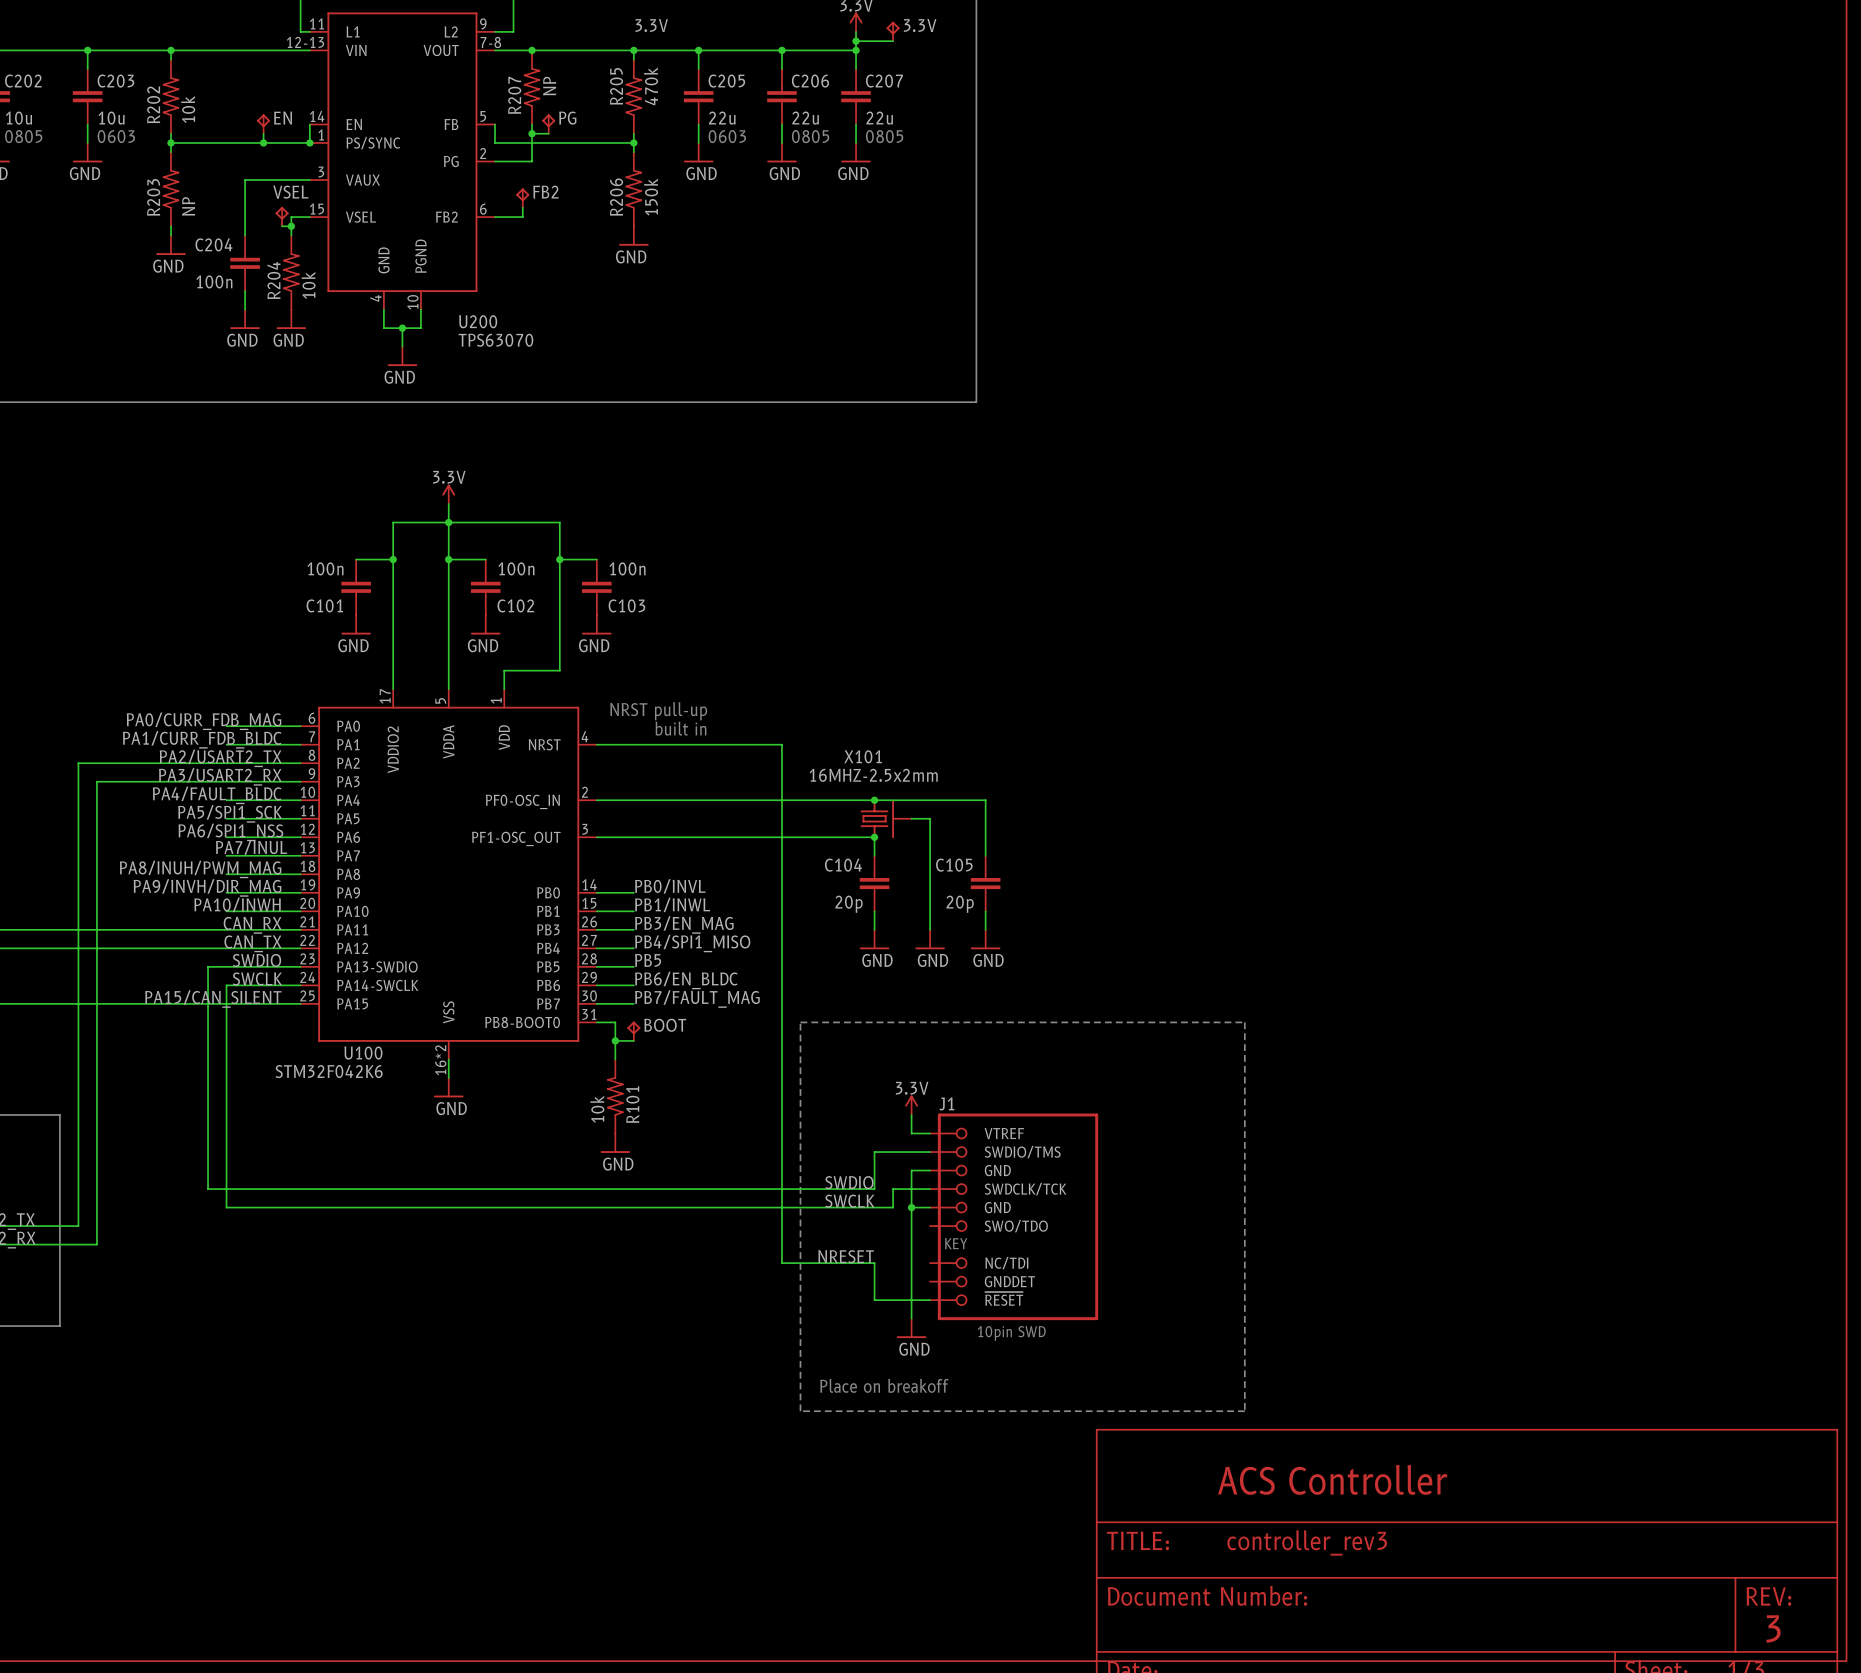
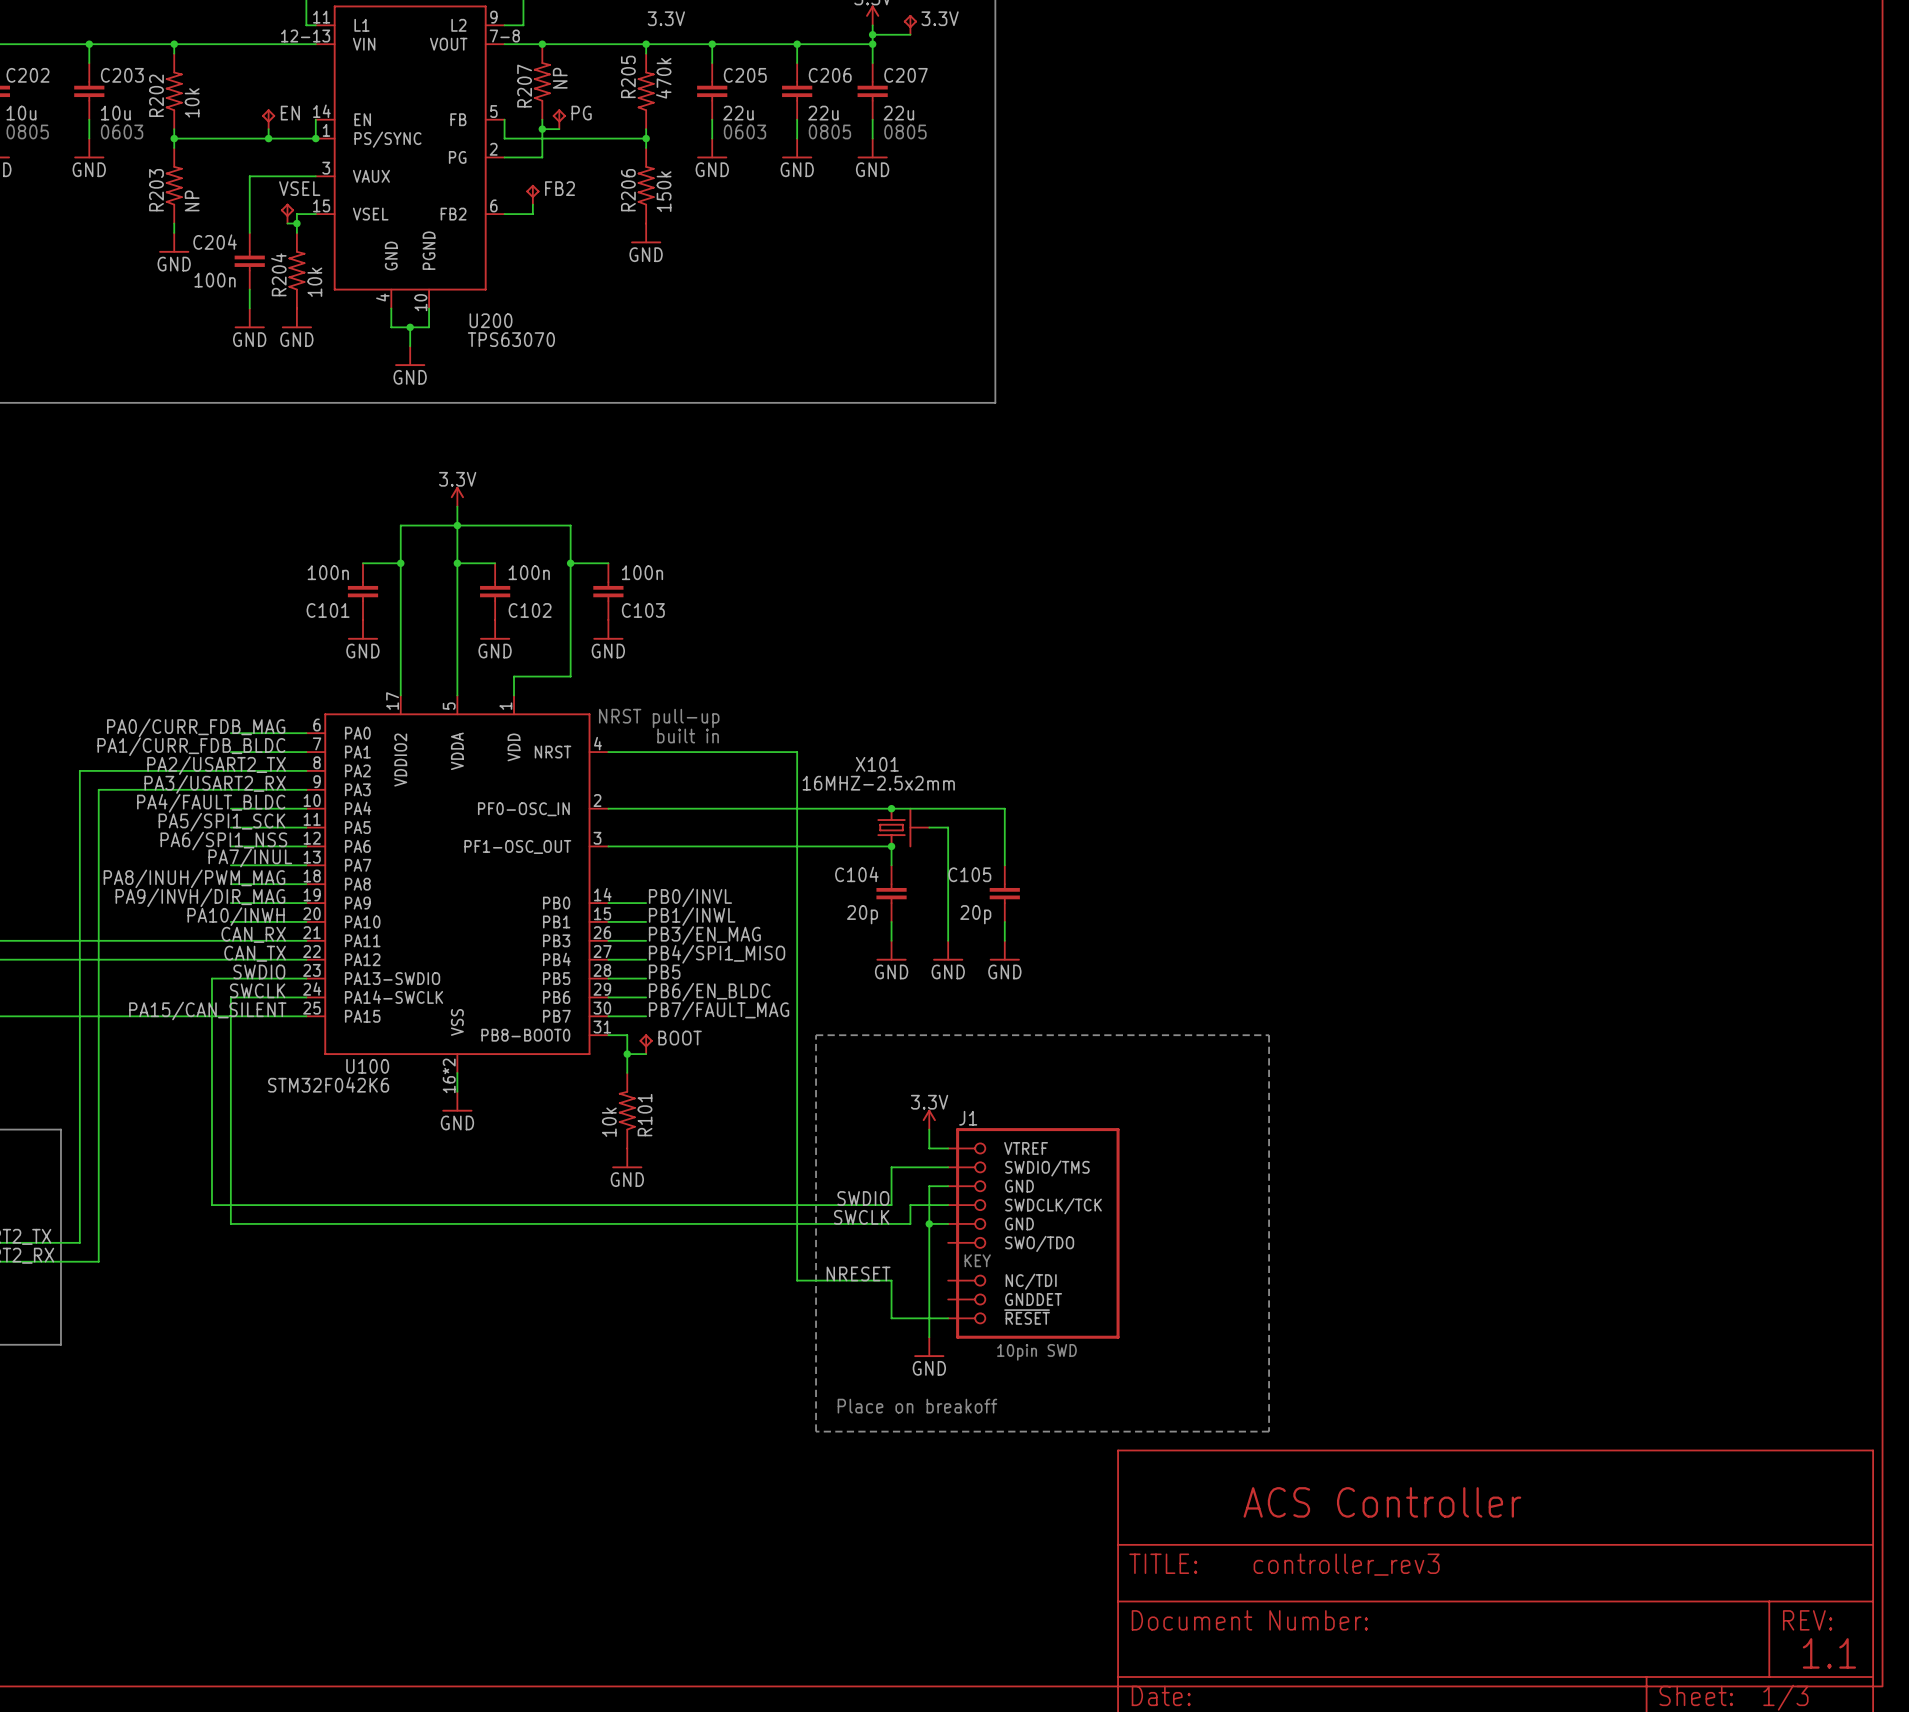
text: 3 (1773, 1628) -> 1.1 (1829, 1653)

